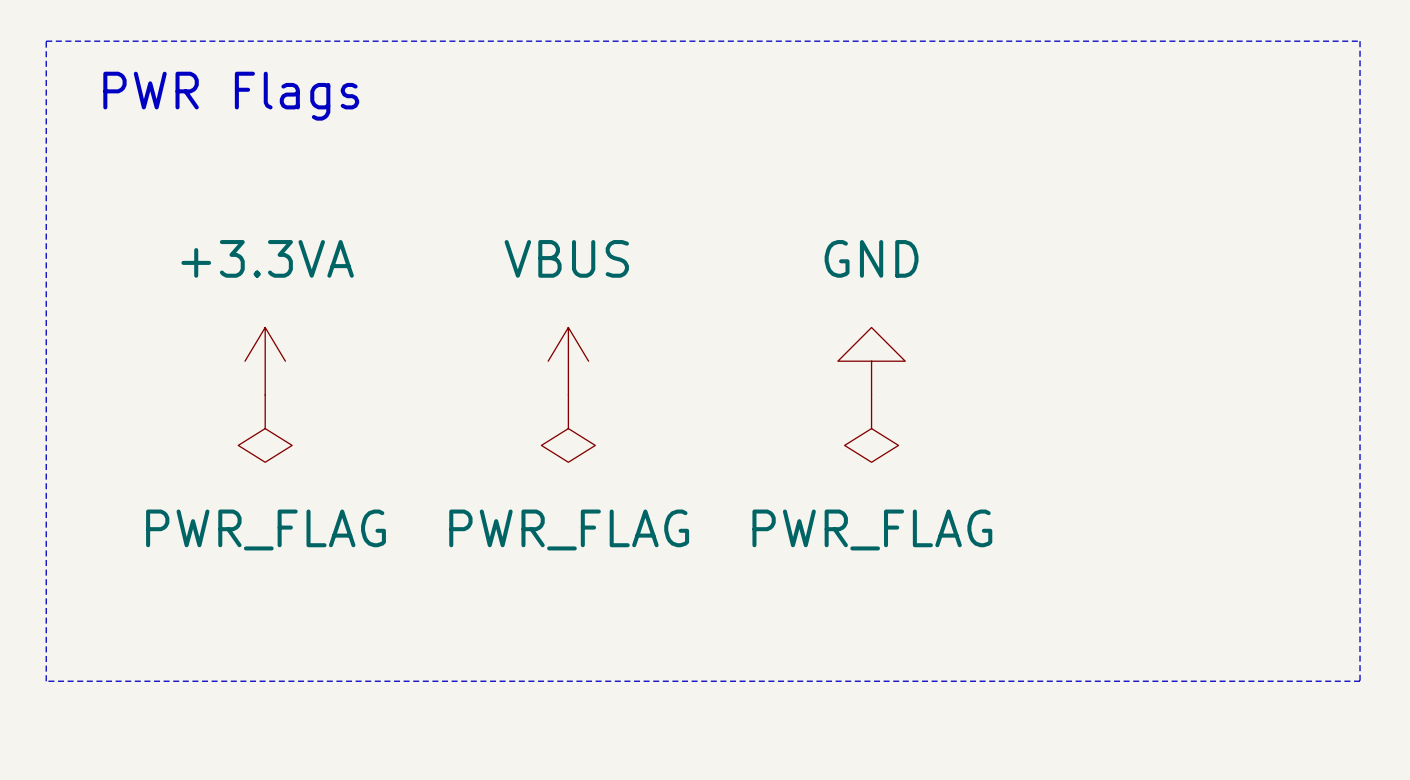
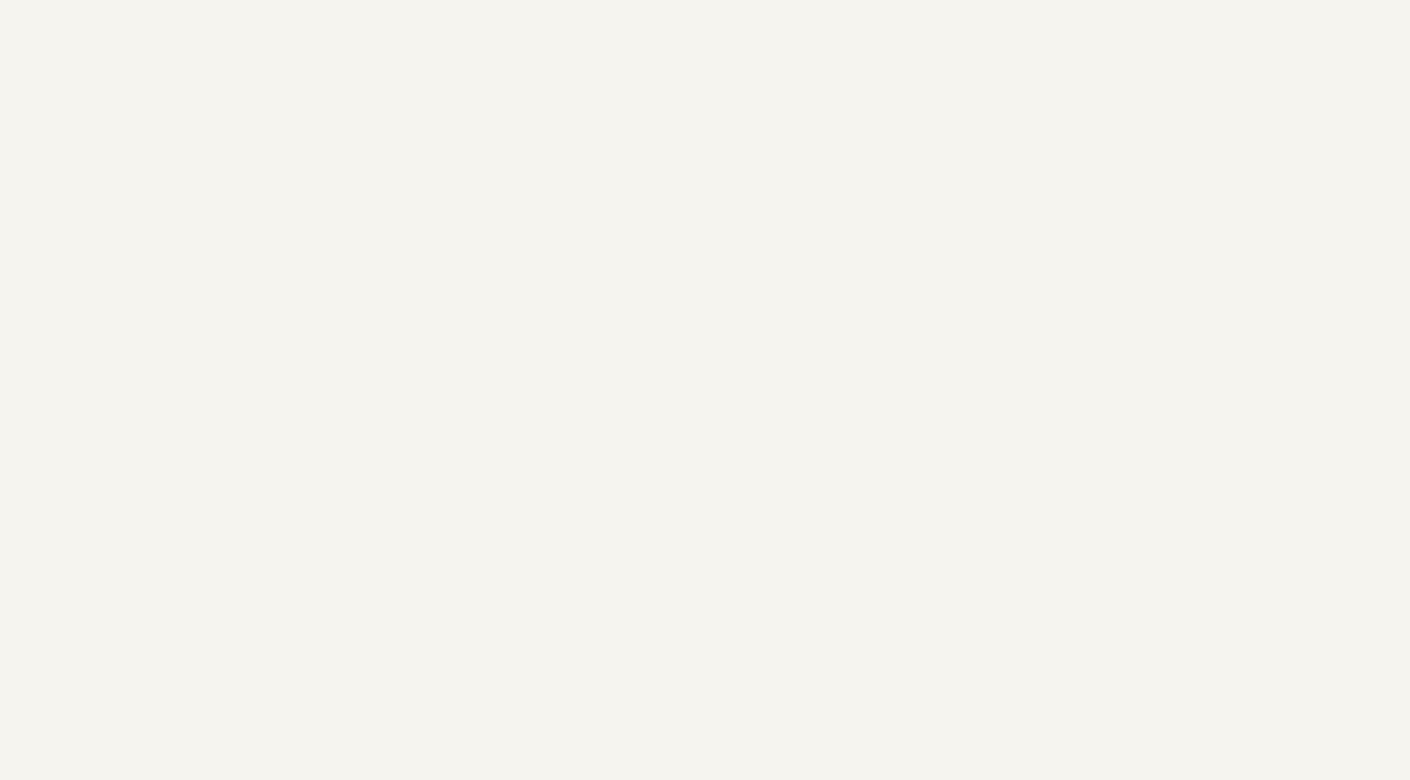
line: (46, 41) (1360, 41) (1360, 681) (46, 681) (46, 41) -> none
text: PWR Flags (231, 96) -> none
power symbol: +3.3VA (265, 361) -> none
power symbol: VBUS (568, 361) -> none
power symbol: GND (871, 361) -> none
power symbol: PWR_FLAG (265, 428) -> none
power symbol: PWR_FLAG (568, 428) -> none
power symbol: PWR_FLAG (871, 428) -> none

